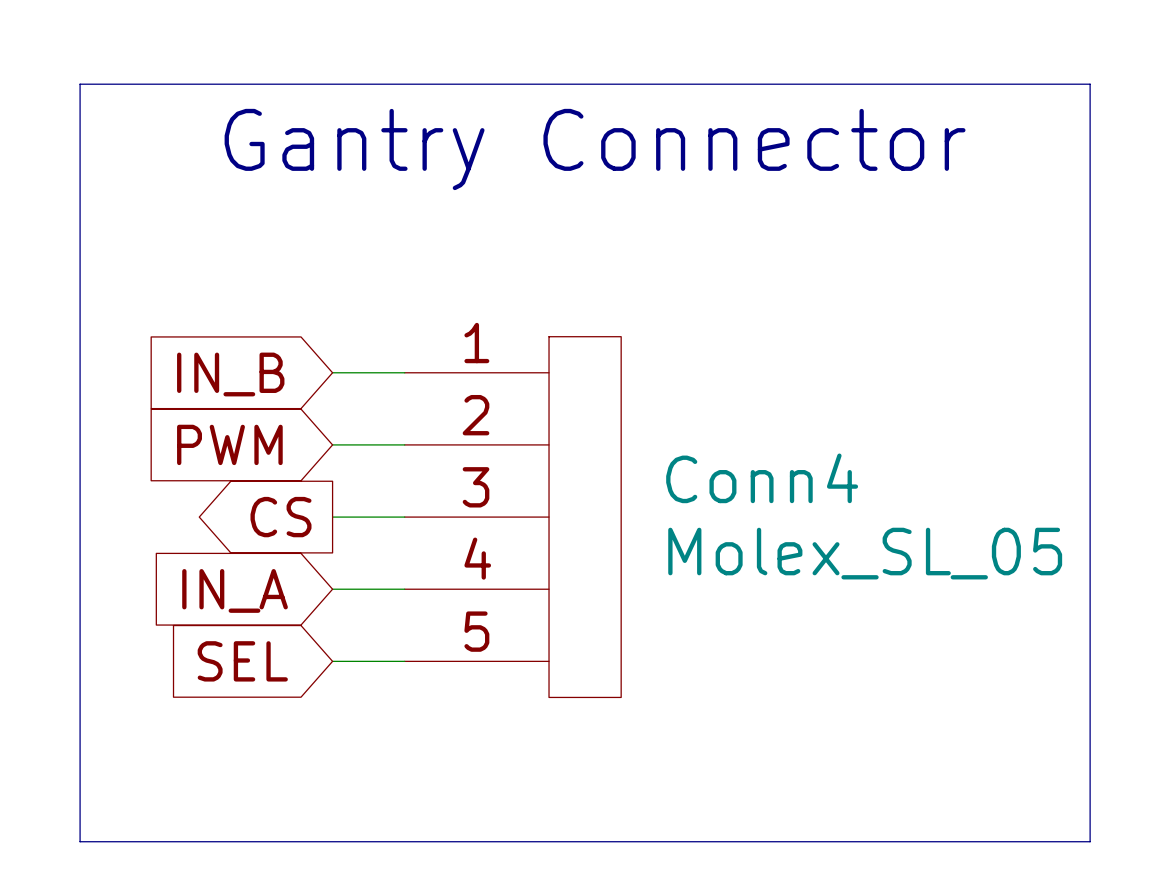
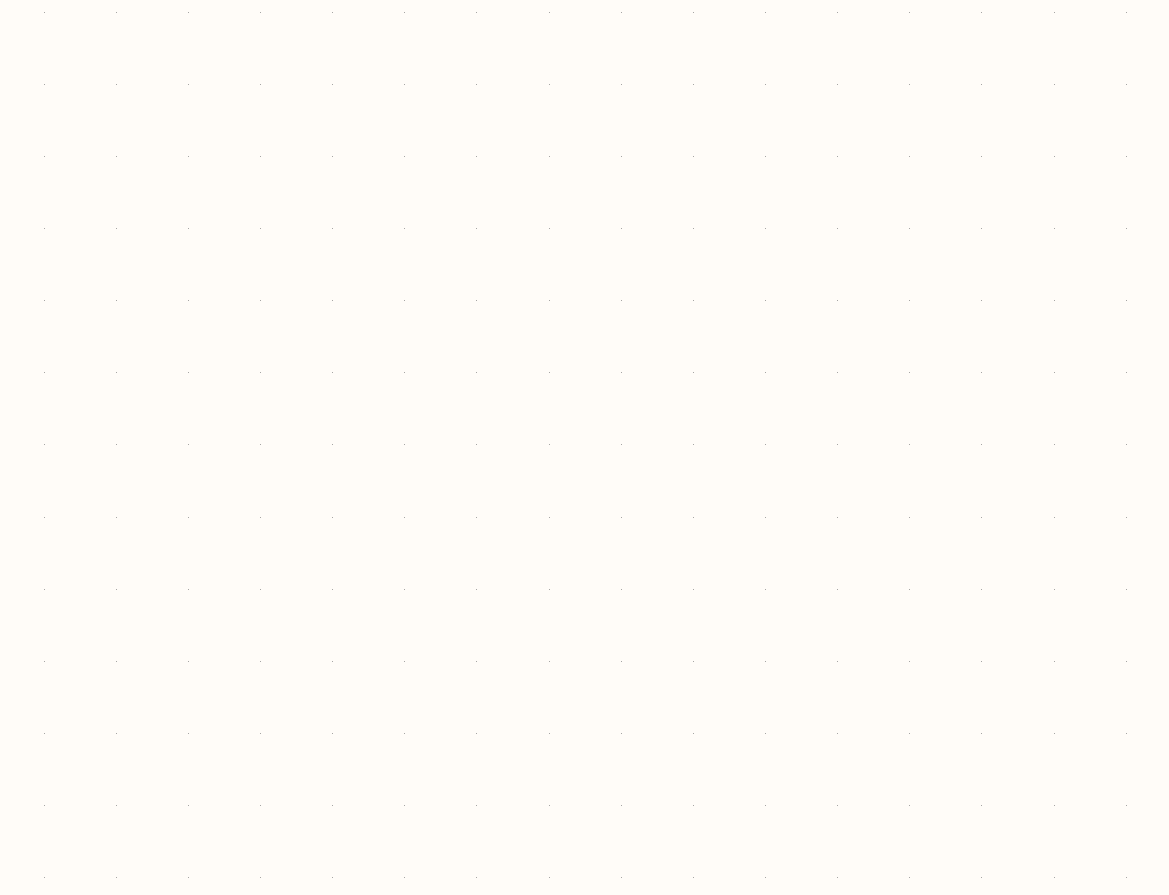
line: (80, 84) (1090, 84) (1090, 841) (80, 841) (80, 84) -> none
text: Gantry Connector (595, 149) -> none
wire: (332, 372) (404, 372) -> none
global label: IN_B (230, 374) -> none
global label: PWM (229, 444) -> none
wire: (332, 444) (404, 444) -> none
global label: CS (280, 517) -> none
wire: (332, 517) (404, 517) -> none
Conn4: Molex_SL_05 (512, 517) -> none
wire: (332, 589) (404, 589) -> none
global label: IN_A (235, 590) -> none
global label: SEL (242, 661) -> none
wire: (332, 661) (404, 661) -> none

